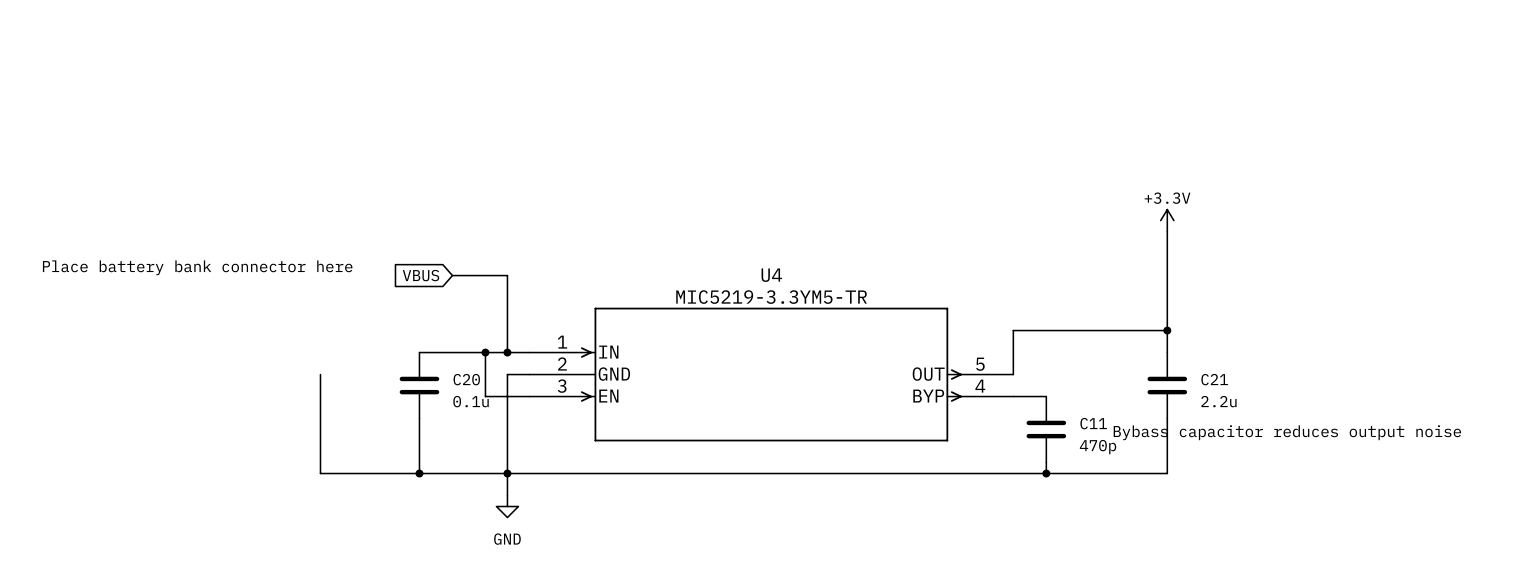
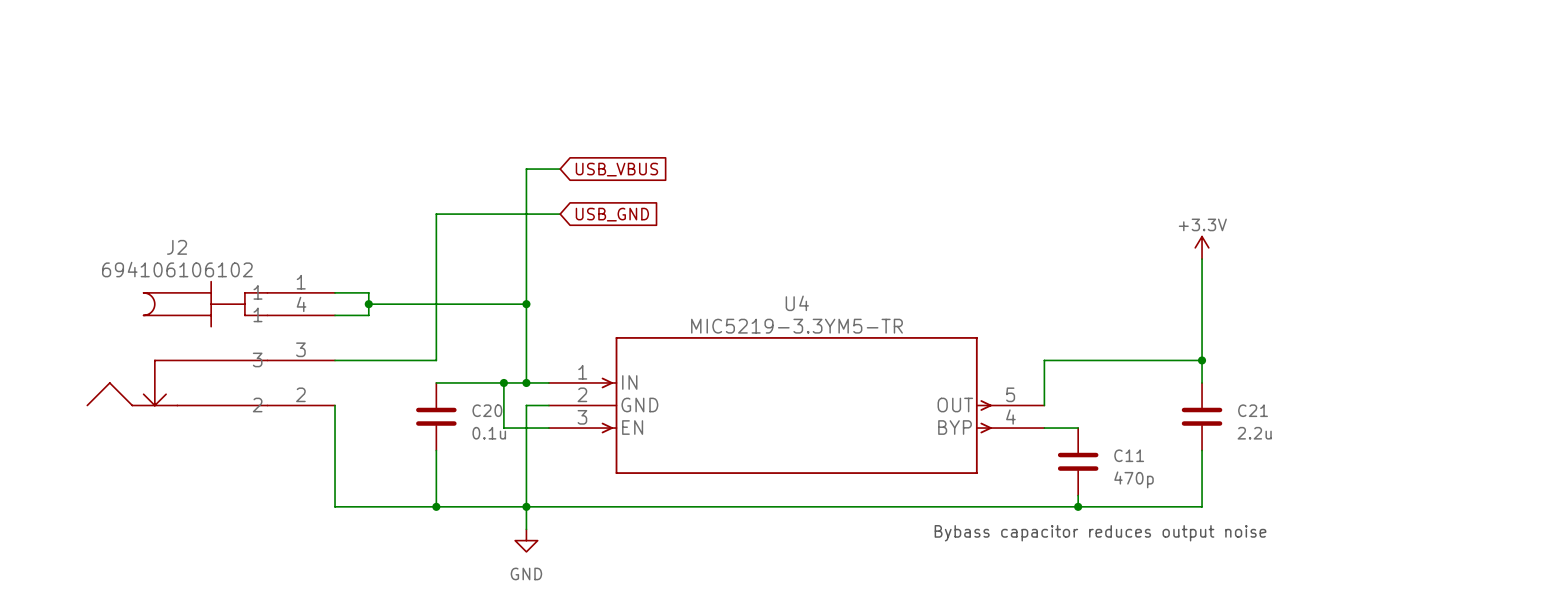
wire: none -> (560, 169) (526, 169) (526, 304)
global label: none -> USB_VBUS (616, 169)
wire: none -> (560, 214) (436, 214) (436, 360) (335, 360)
global label: none -> USB_GND (612, 214)
wire: none -> (335, 292) (368, 292) (368, 315) (335, 315)
text: Place battery bank connector here (197, 267) -> none
wire: none -> (368, 304) (470, 304)
junction: none -> (368, 304)
global label: VBUS (421, 275) -> none
junction: none -> (526, 304)
J2: none -> 694106106102 (210, 343)
text: Bybass capacitor reduces output noise (1287, 432) -> none
text: none -> Bybass capacitor reduces output noise (1100, 533)

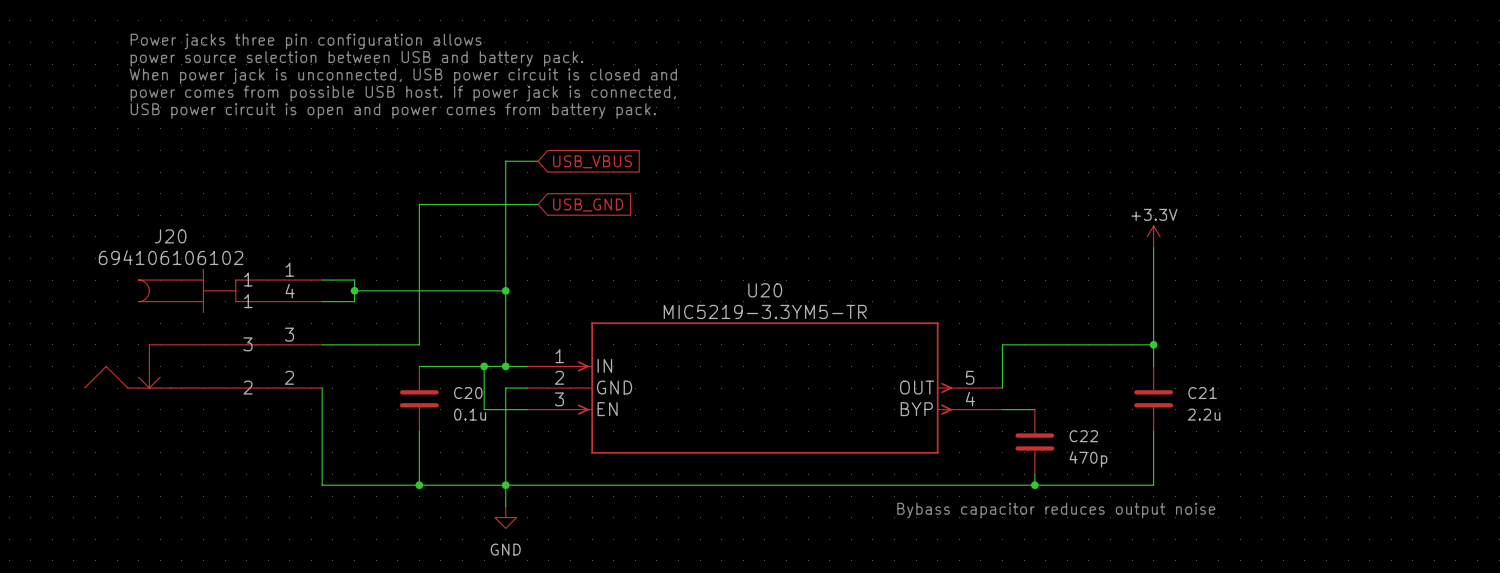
text: none -> Power jacks three pin configuration allows (306, 41)
text: none -> power source selection between USB and battery pack. (356, 58)
text: none -> When power jack is unconnected, USB power circuit is closed and (403, 76)
text: none -> power comes from possible USB host. If power jack is connected, (403, 93)
text: none -> USB power circuit is open and power comes from battery pack. (393, 111)
J2 name: J2 (177, 247) -> J20 (170, 236)
U4 name: U4 (797, 303) -> U20 (765, 290)
C11 name: C11 (1129, 455) -> C22 (1083, 436)

